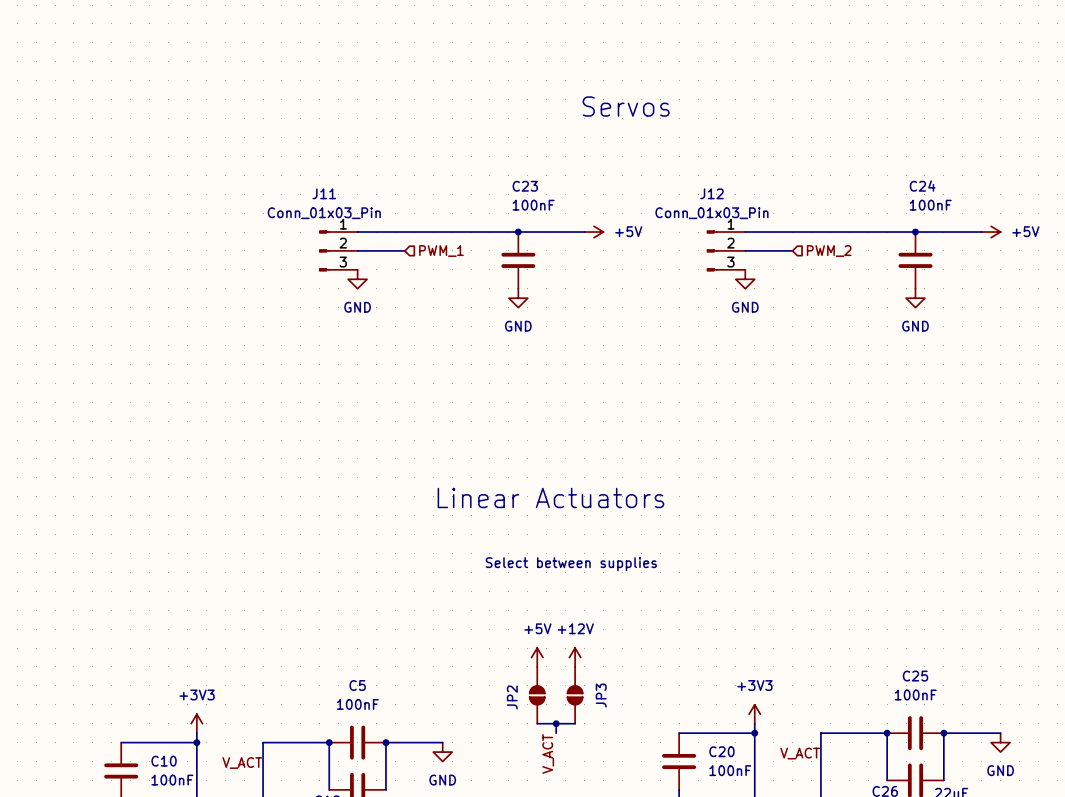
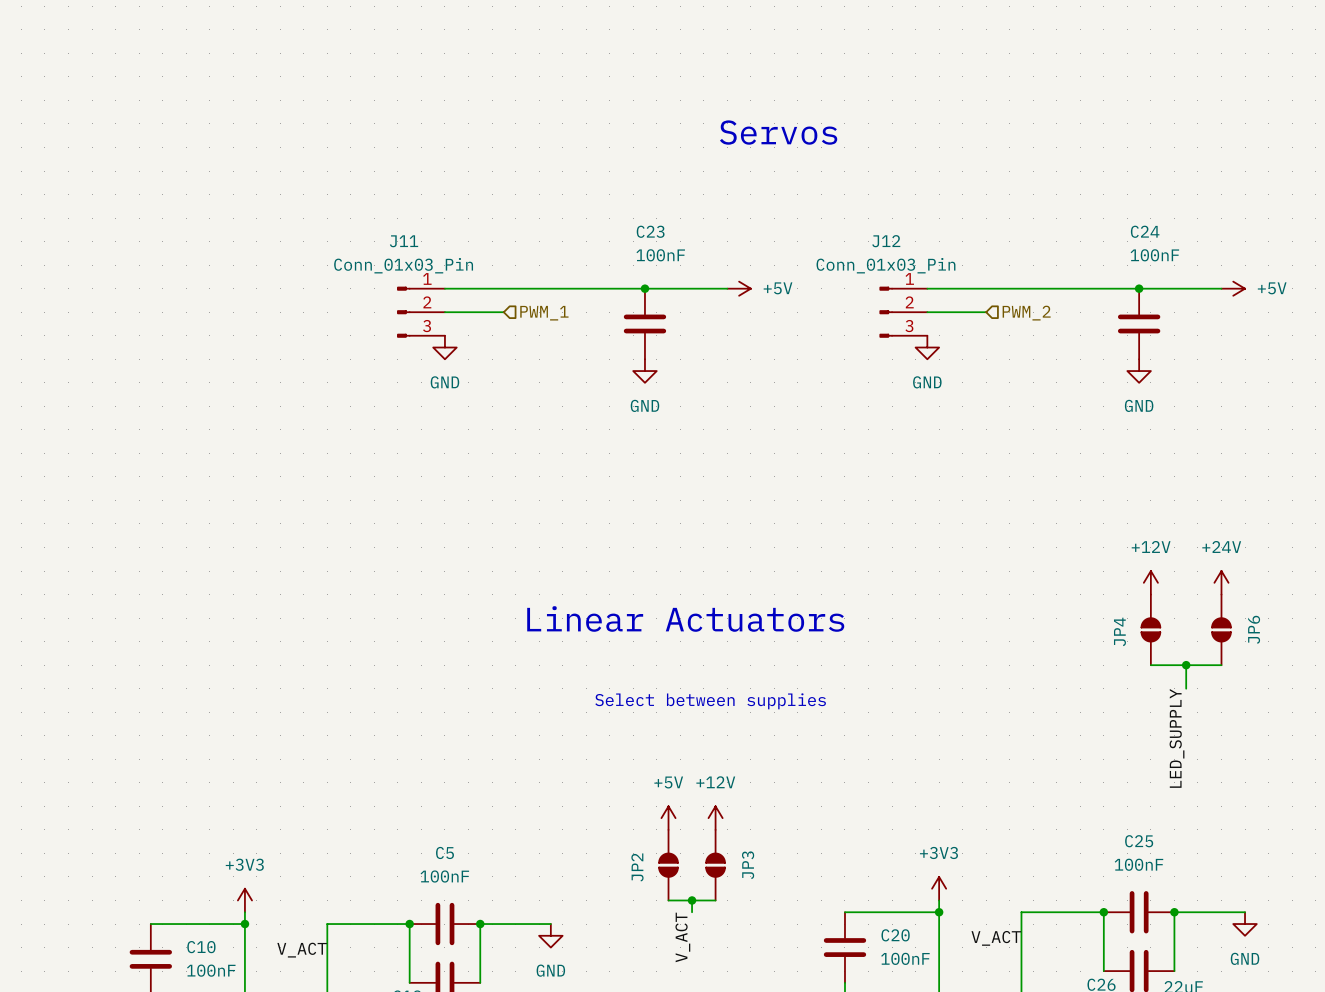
power symbol: none -> +12V (1150, 582)
power symbol: none -> +24V (1221, 582)
JP4: none -> (1150, 629)
JP6: none -> (1221, 629)
wire: none -> (1150, 665) (1221, 665)
wire: none -> (1186, 665) (1186, 688)
junction: none -> (1186, 665)
label: none -> LED_SUPPLY (1177, 738)

